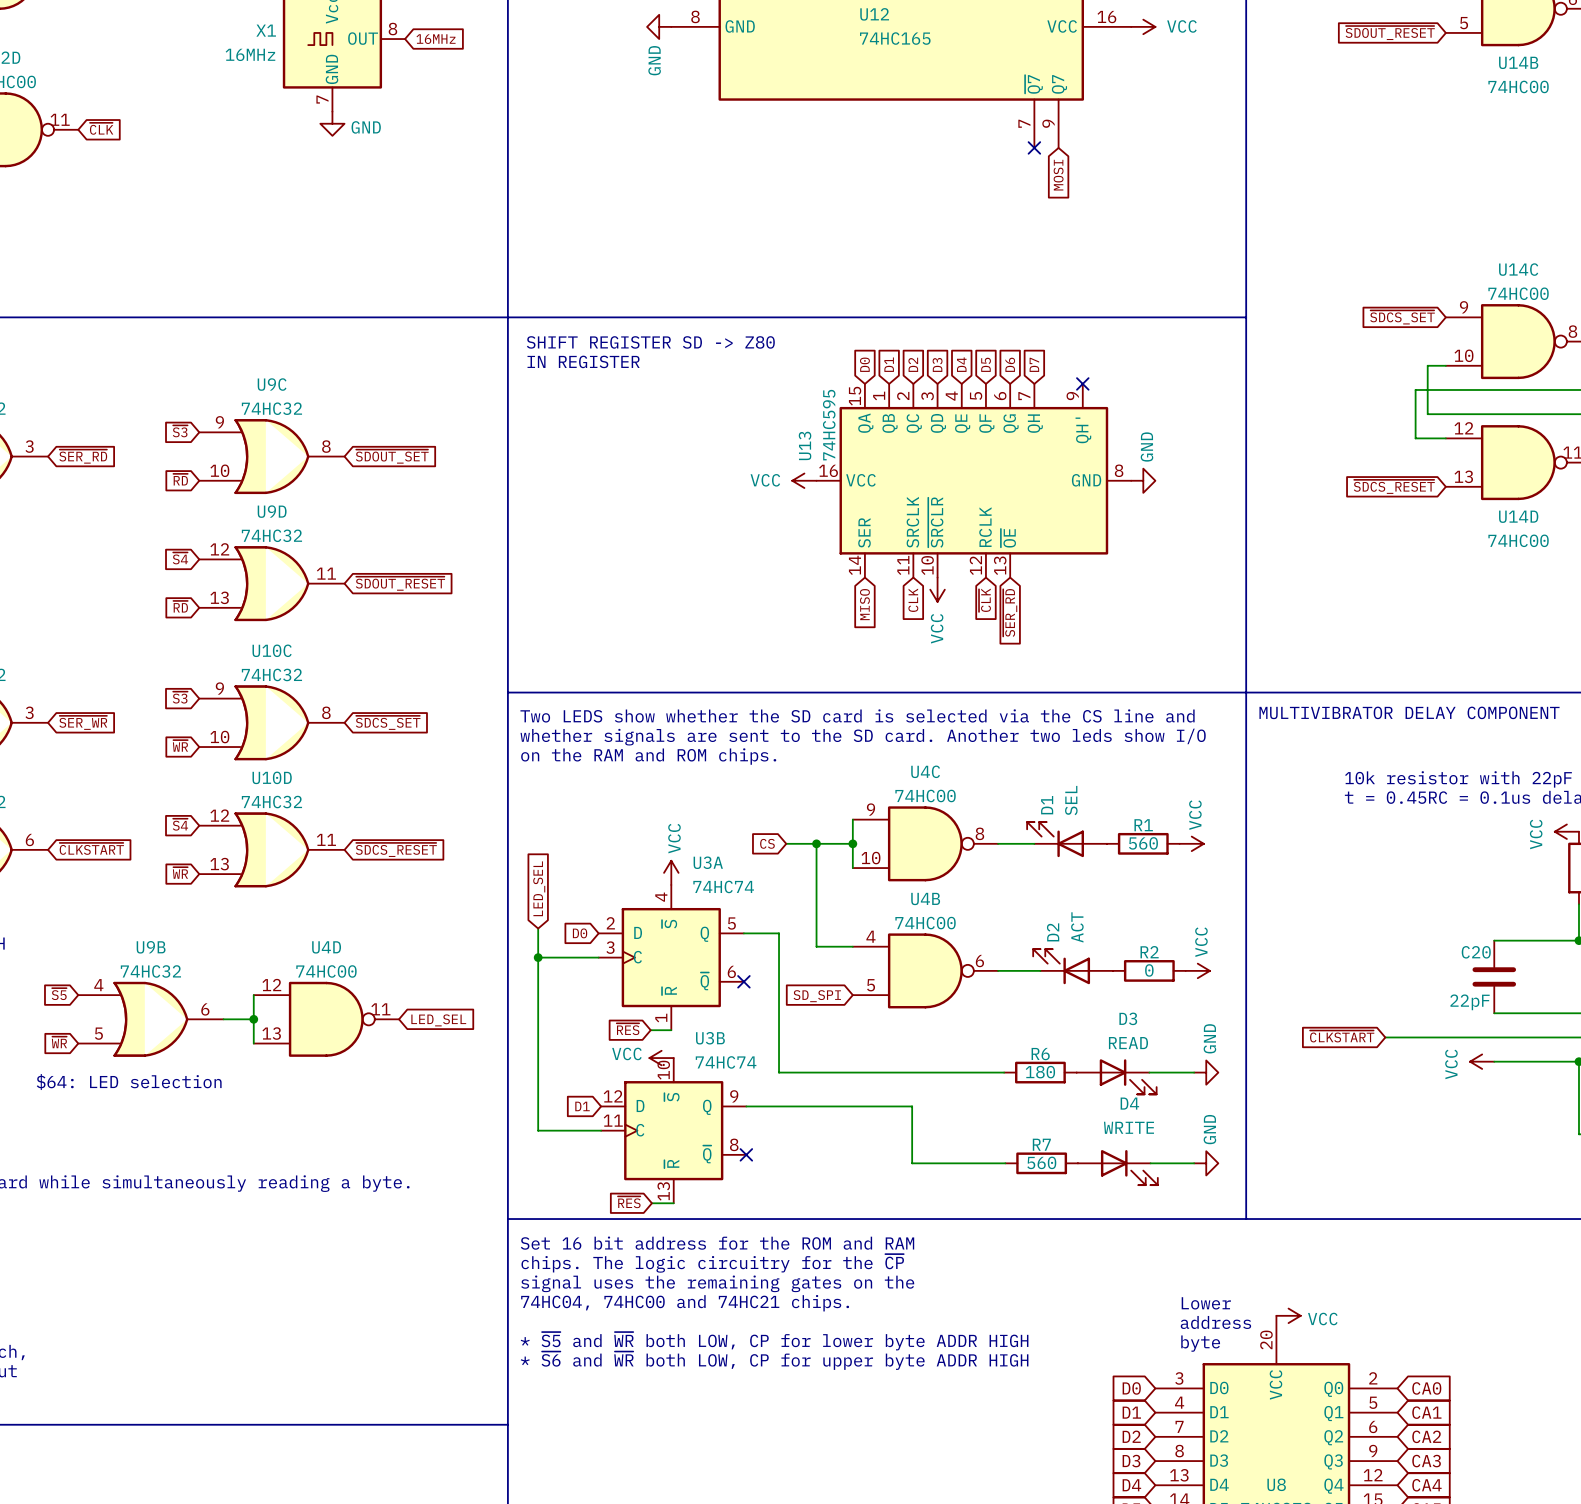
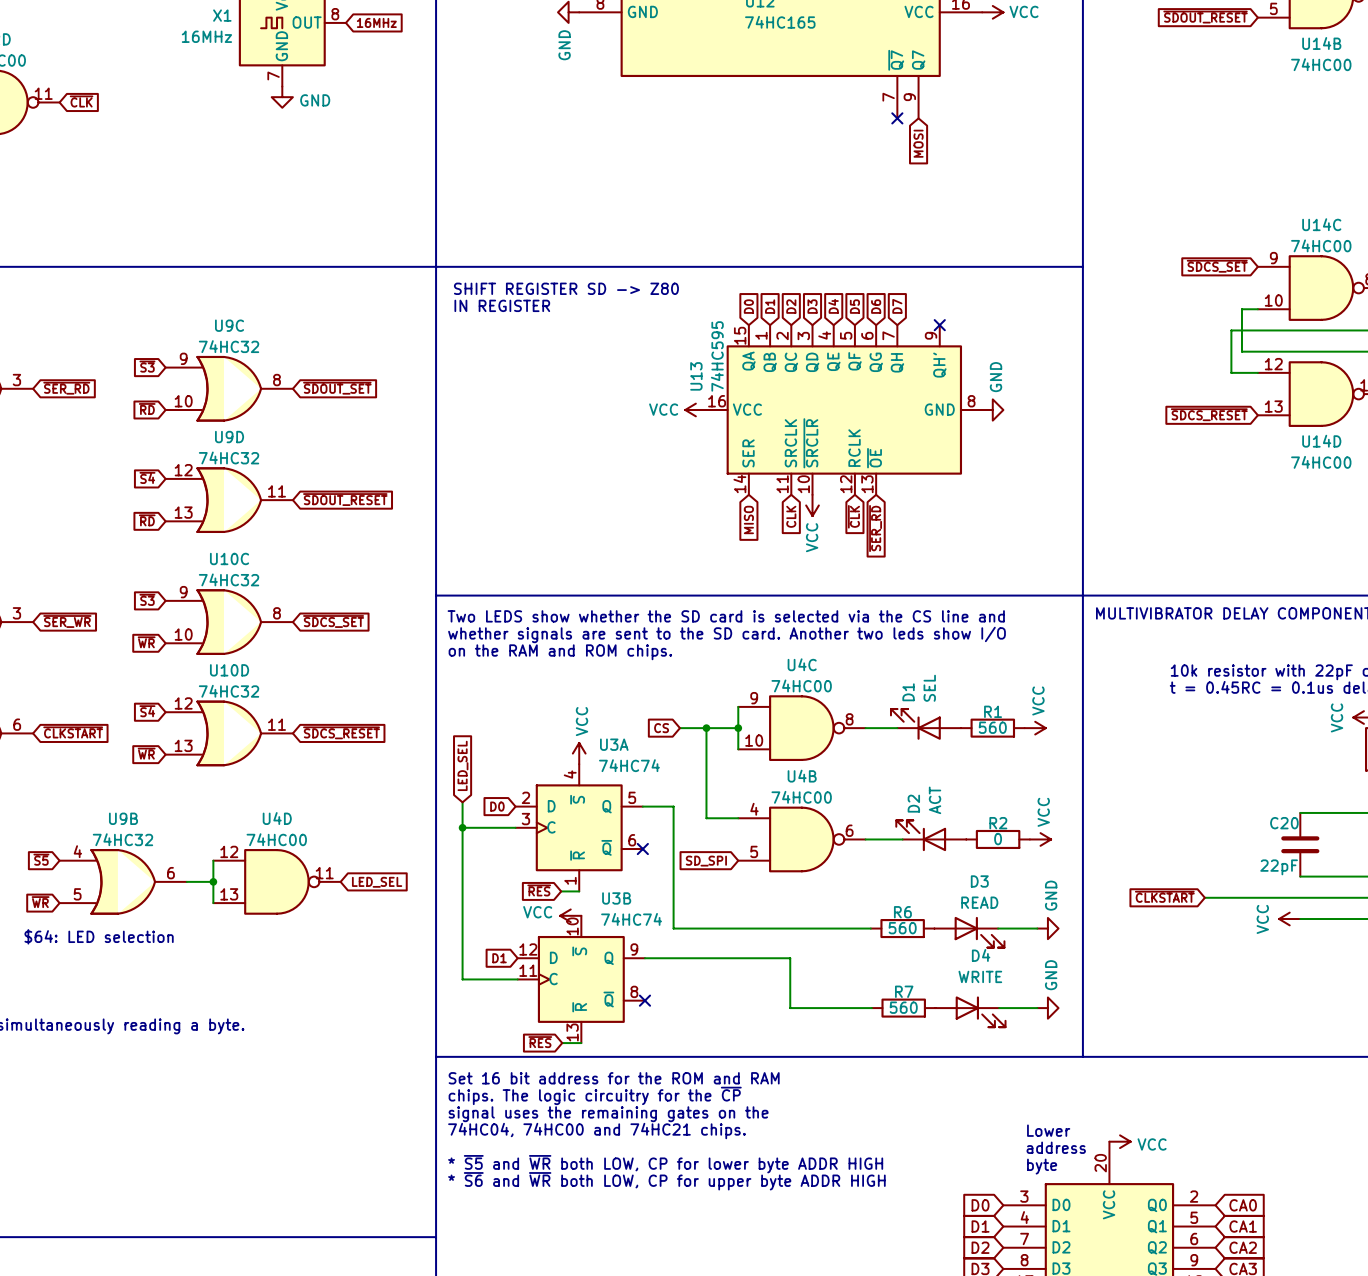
R6 value: 180 (1040, 1072) -> 560 (902, 928)

